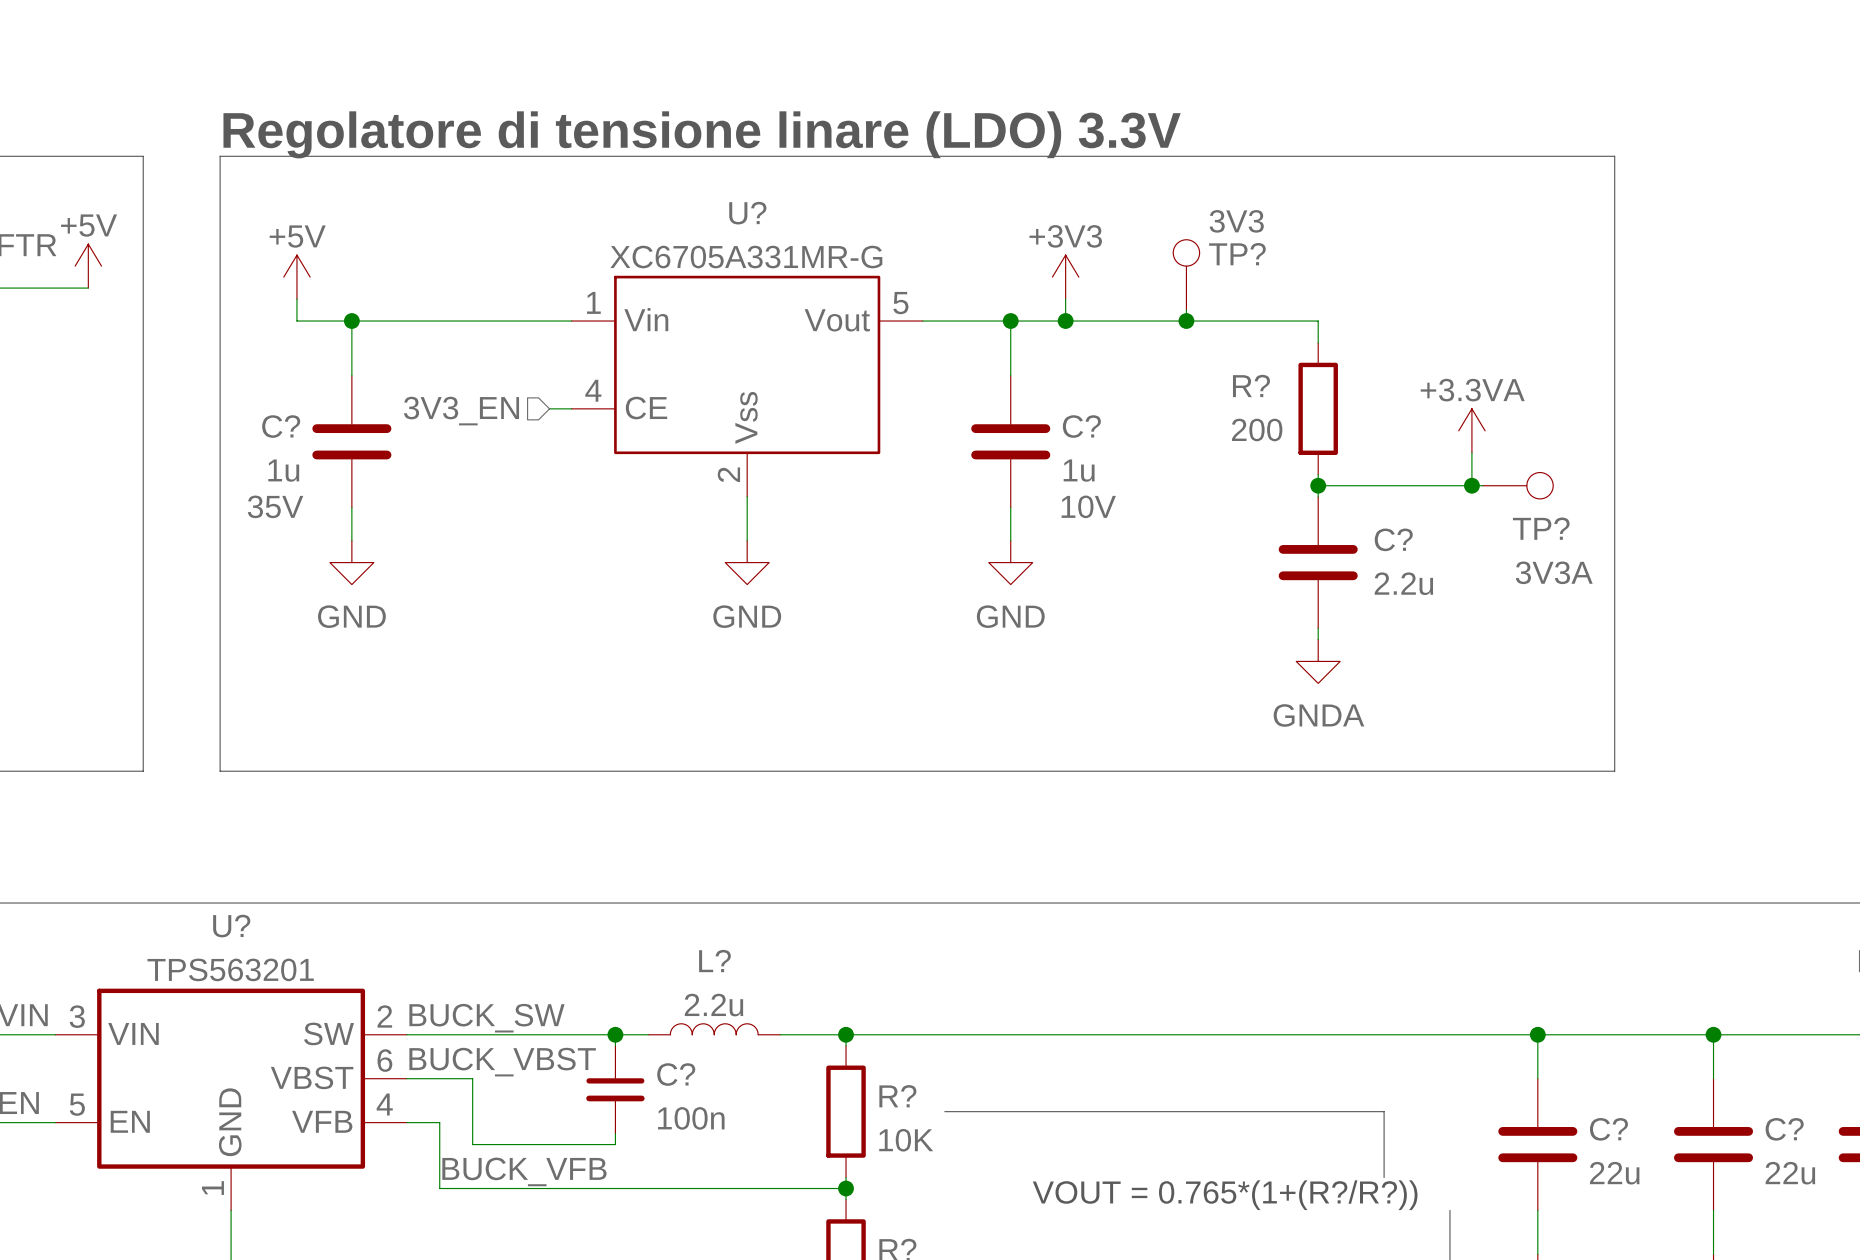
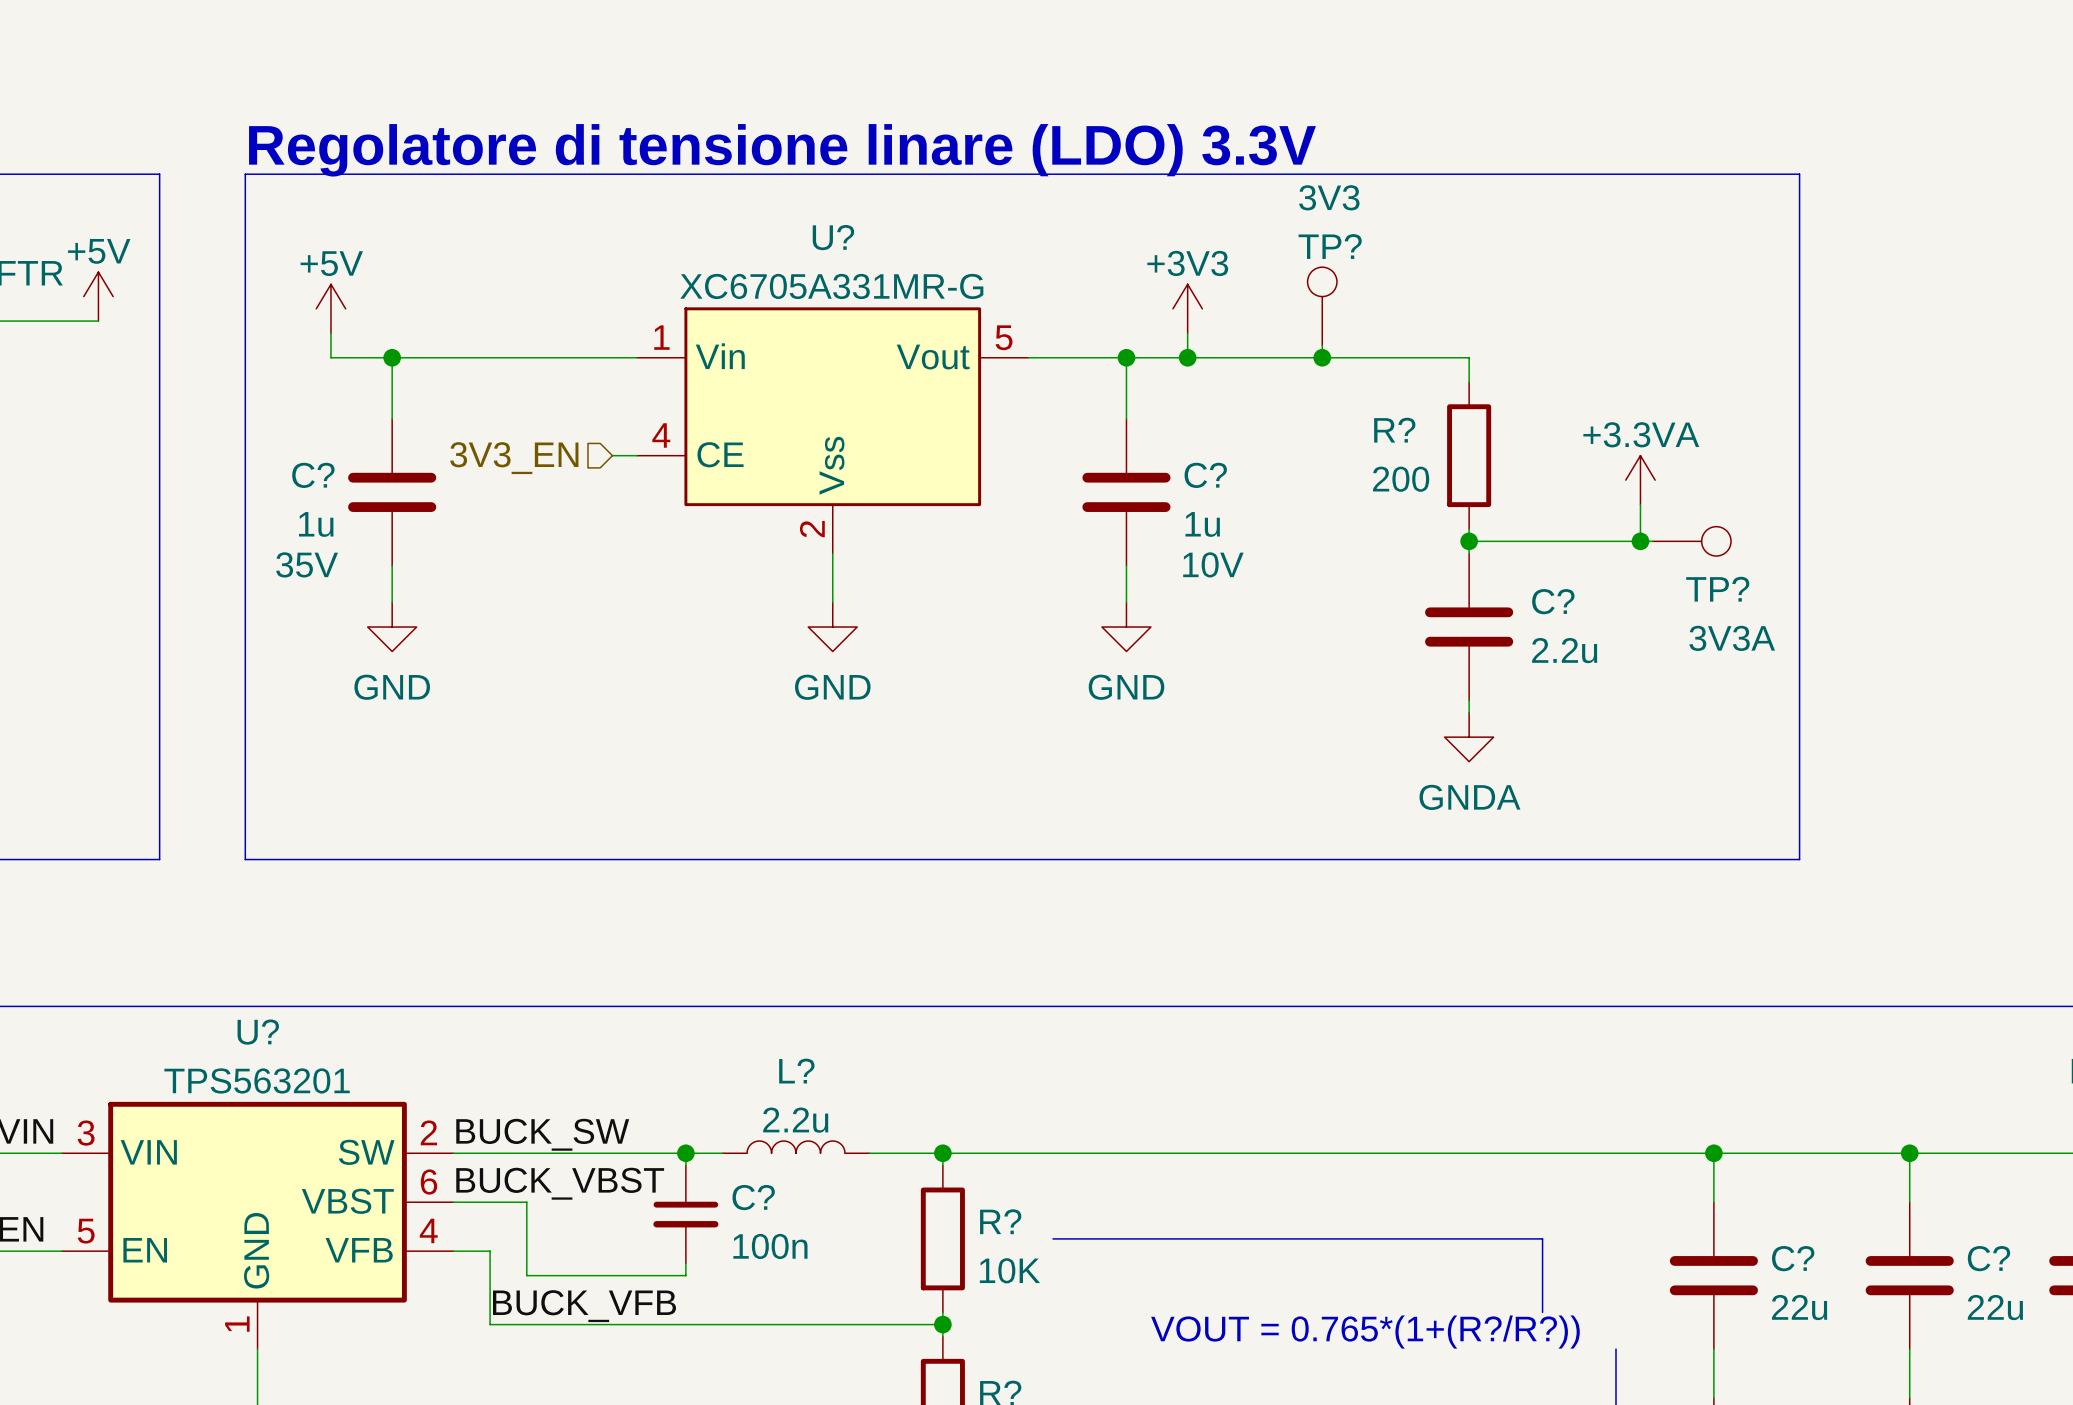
TP? value position: 3V3 (1236, 221) -> 3V3 (1329, 197)
TP? name position: TP? (1237, 254) -> TP? (1330, 246)

